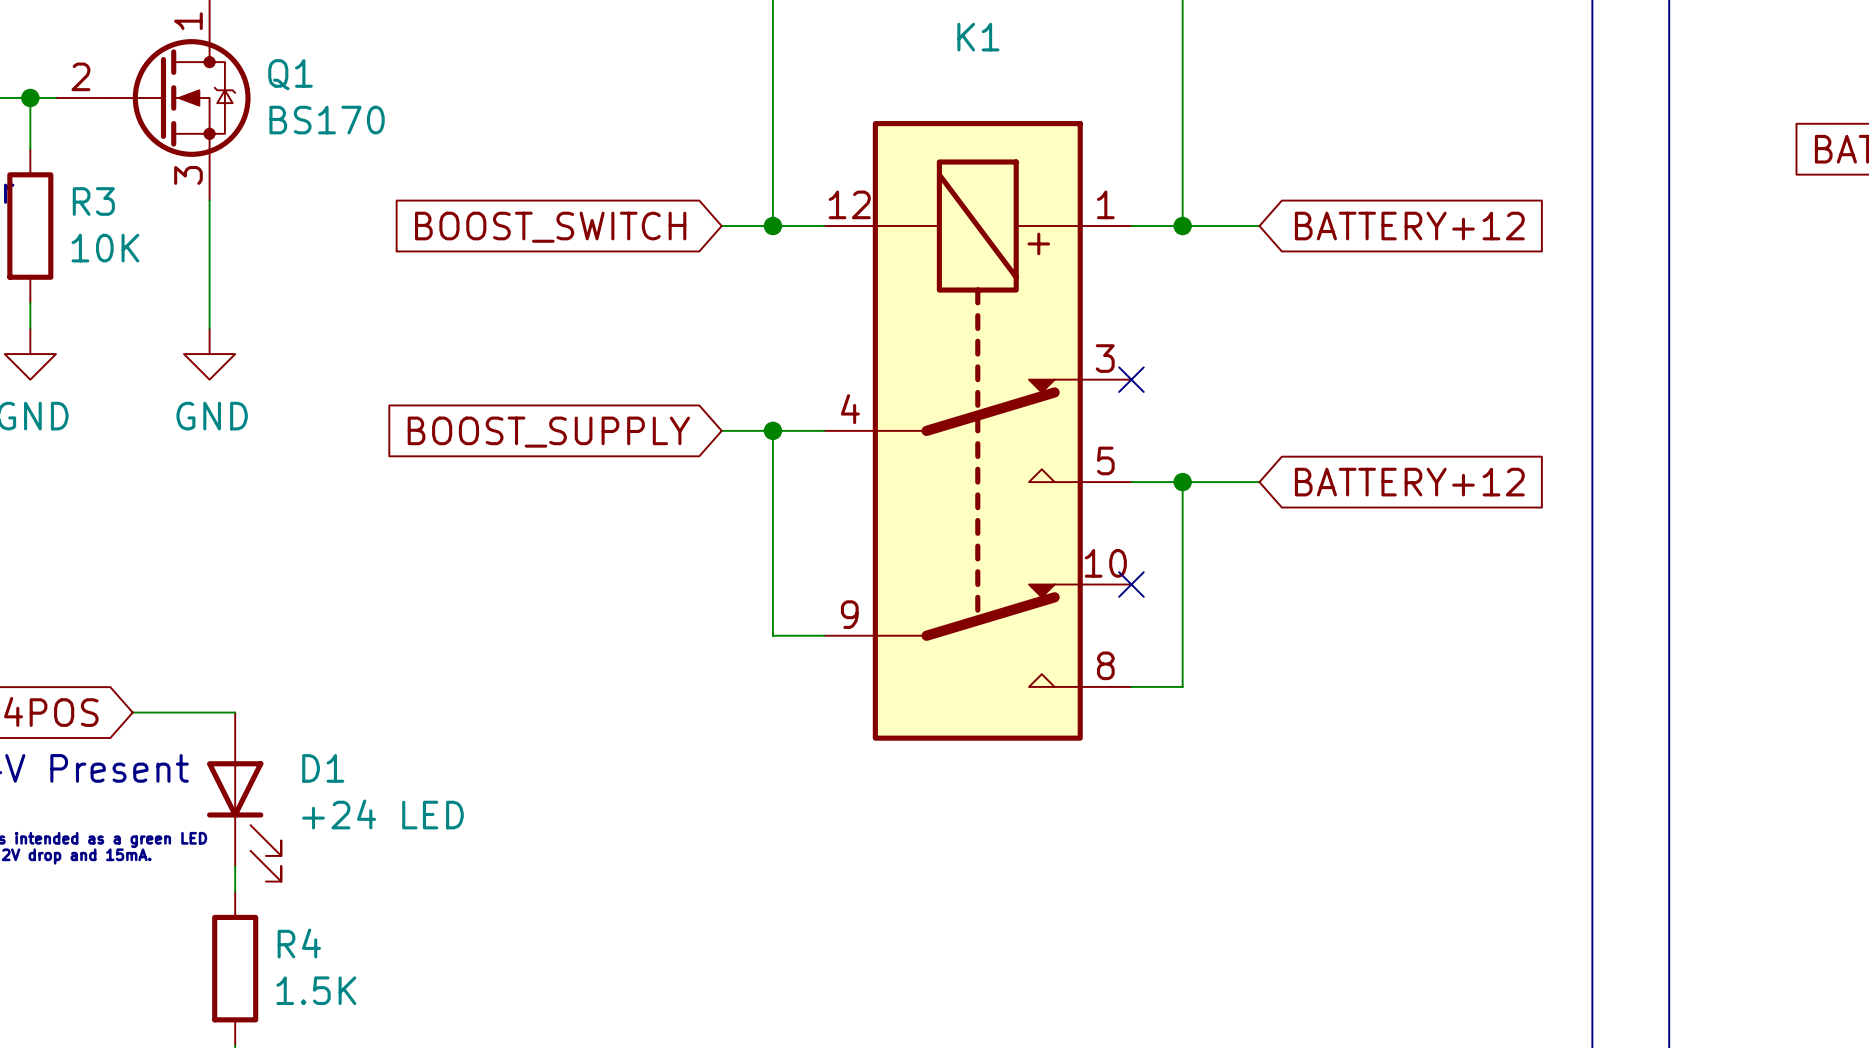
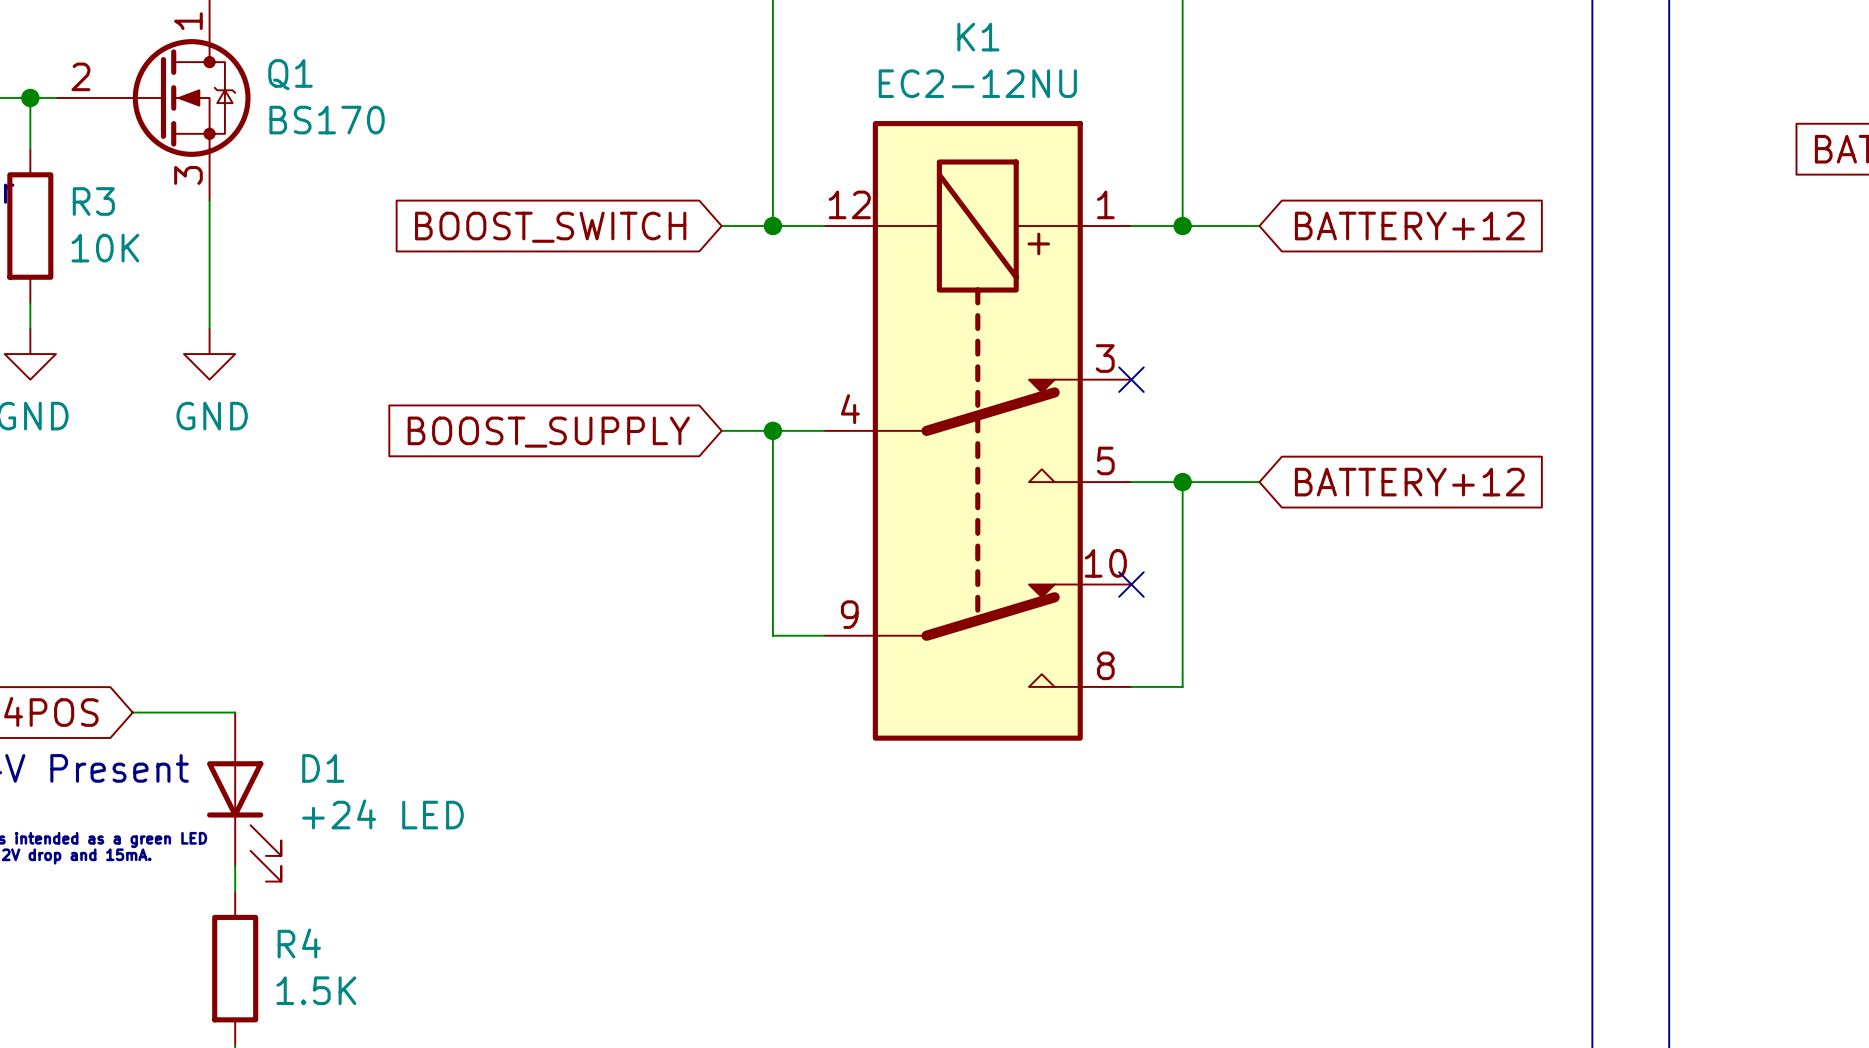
K1 value: none -> EC2-12NU (977, 83)

